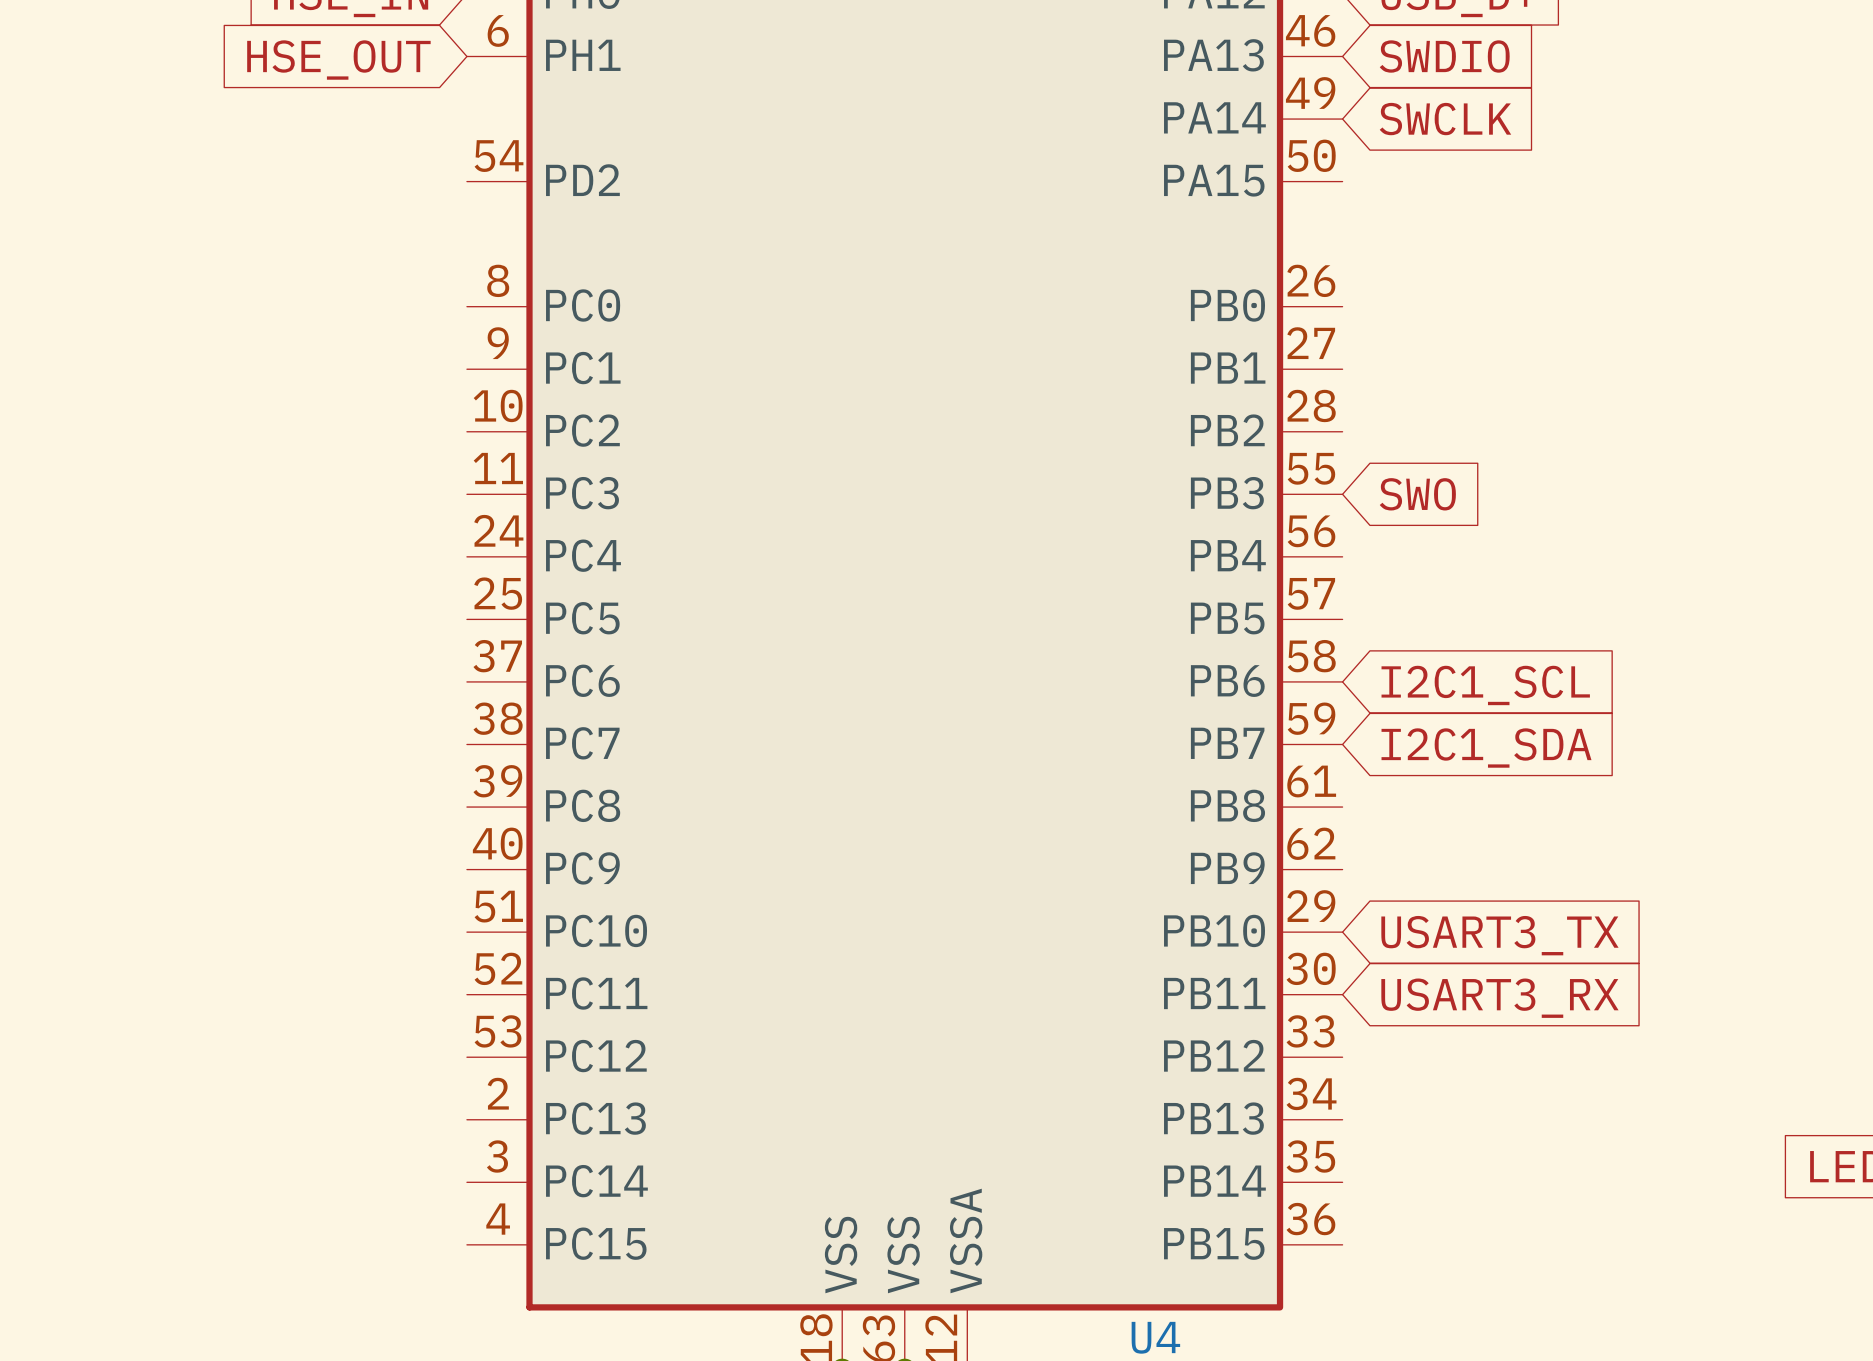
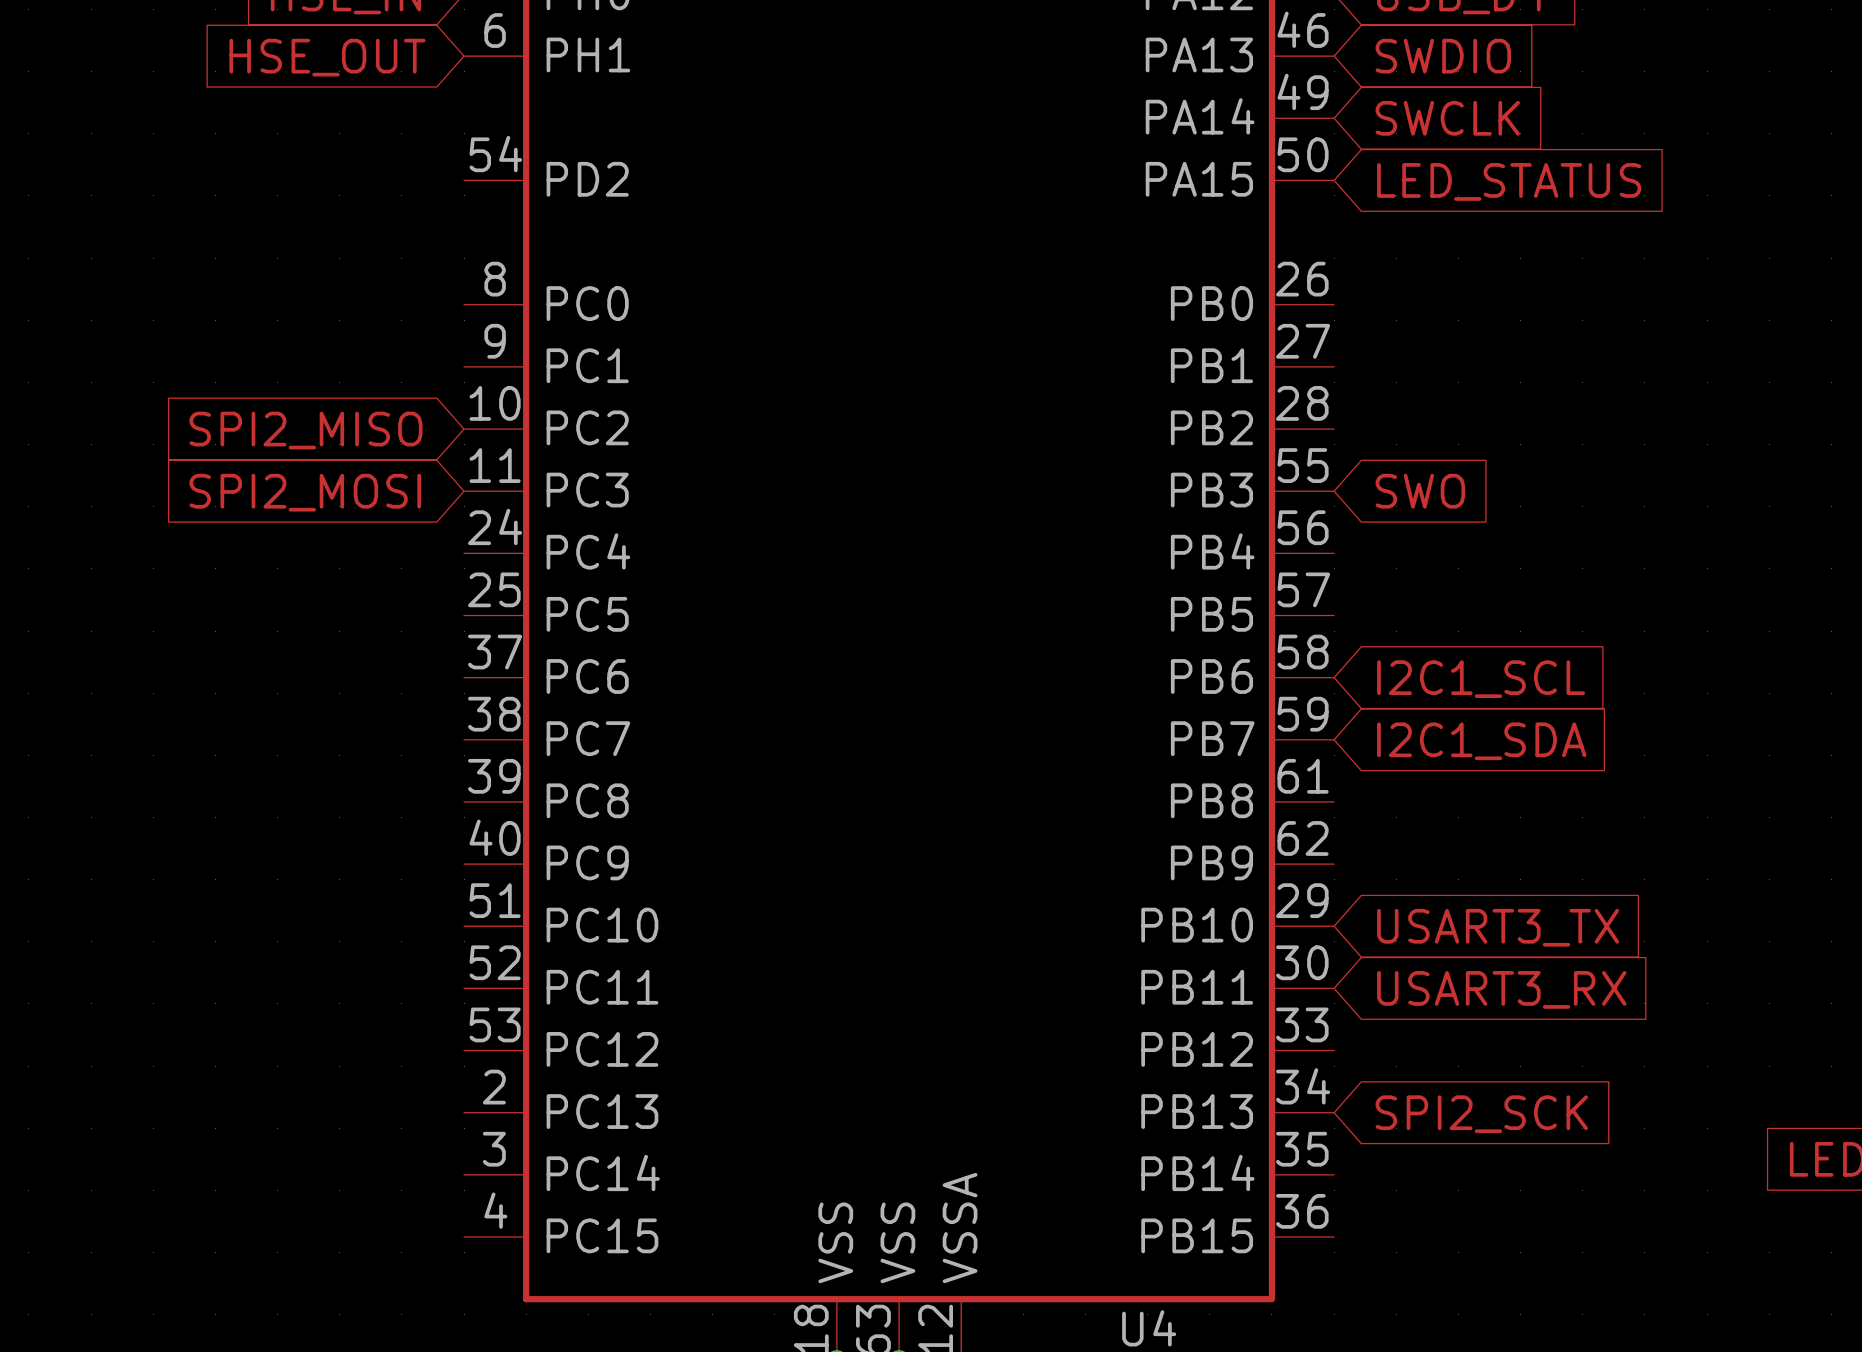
global label: none -> LED_STATUS (1509, 181)
global label: none -> SPI2_MISO (305, 430)
global label: none -> SPI2_MOSI (305, 492)
global label: none -> SPI2_SCK (1481, 1114)

